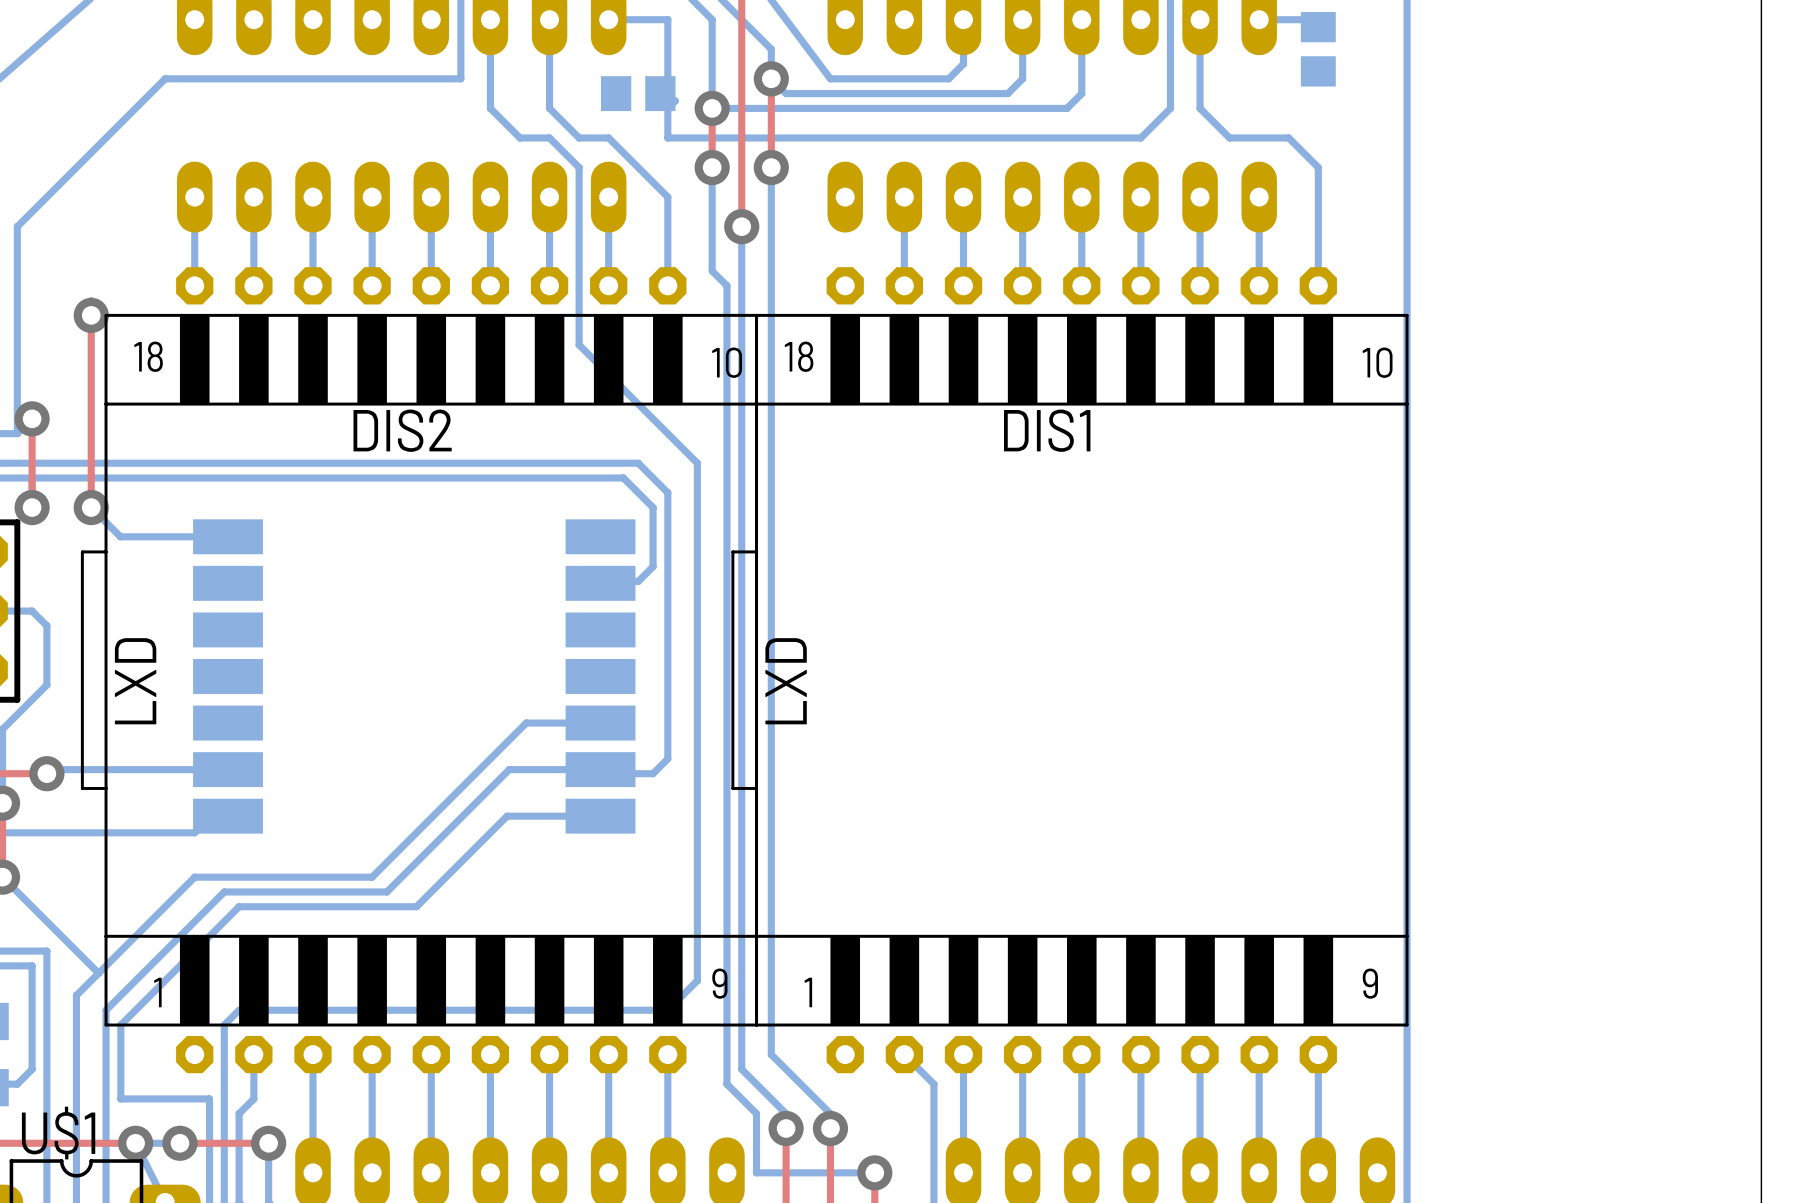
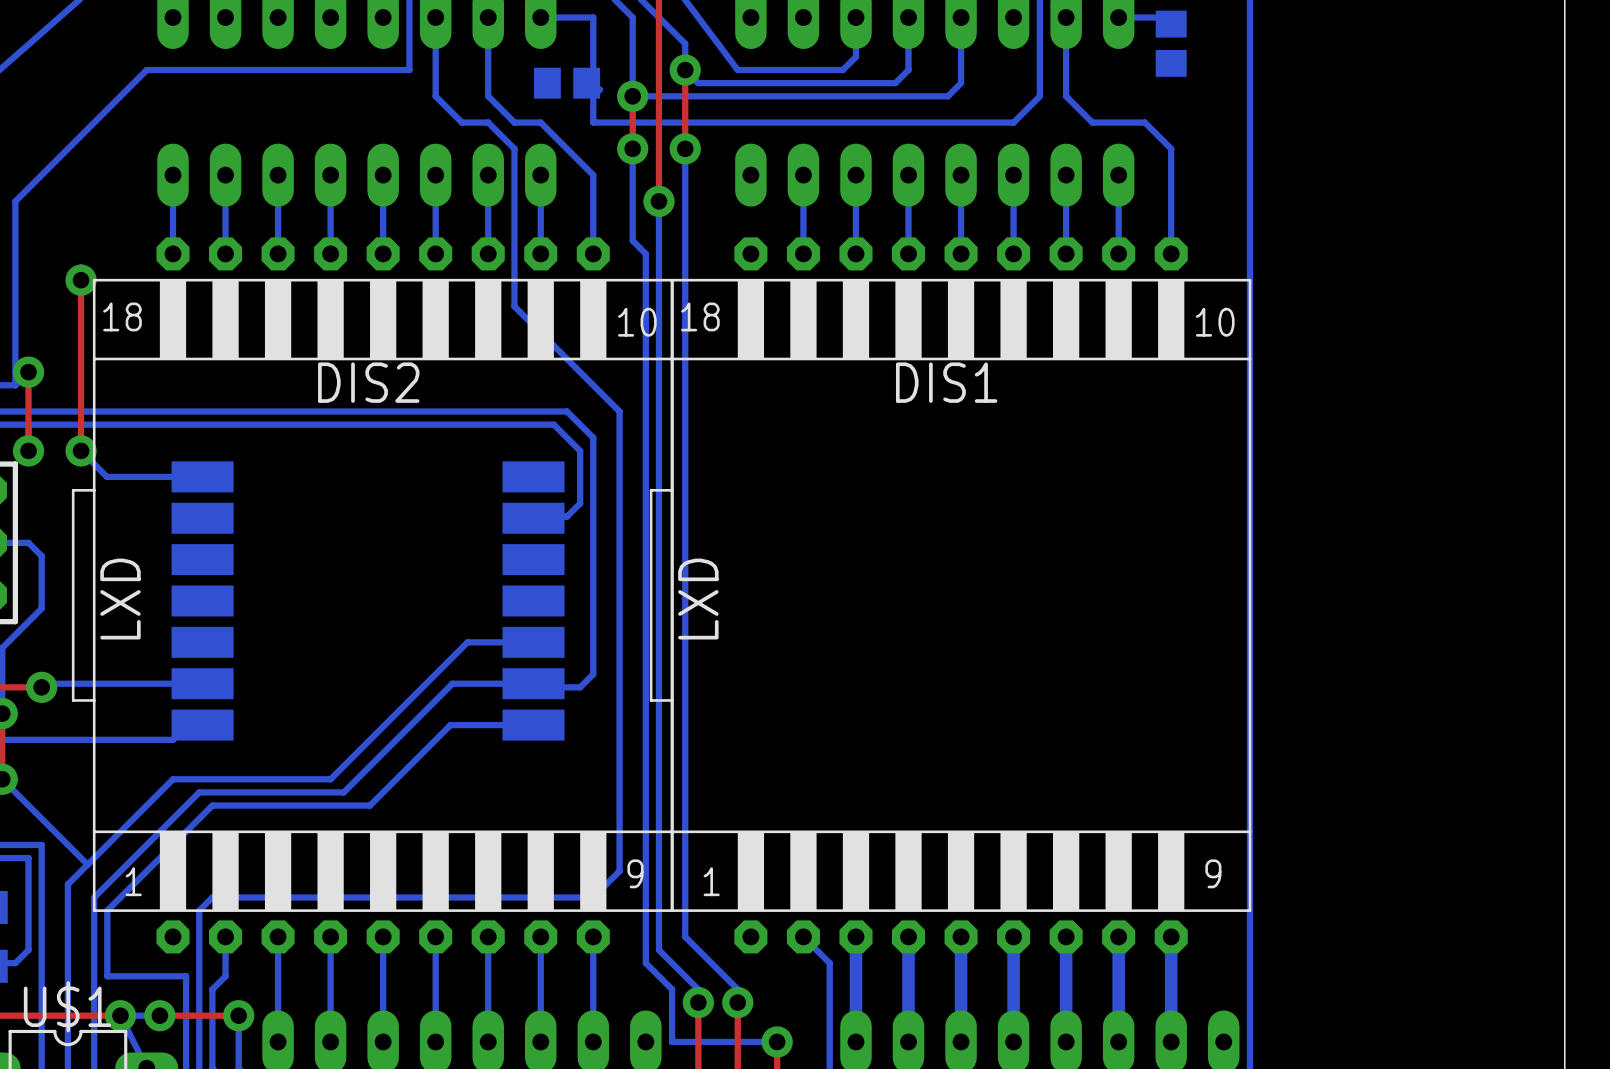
bottom track width: thin (963, 1054) (963, 1172) -> thick (855, 936) (855, 1041)
bottom track width: thin (1022, 1054) (1022, 1172) -> thick (908, 936) (908, 1041)
bottom track width: thin (1081, 1054) (1081, 1172) -> thick (961, 936) (961, 1041)
bottom track width: thin (1140, 1054) (1140, 1172) -> thick (1013, 936) (1013, 1041)
bottom track width: thin (1200, 1054) (1200, 1172) -> thick (1066, 936) (1066, 1041)
bottom track width: thin (1259, 1054) (1259, 1172) -> thick (1118, 936) (1118, 1041)
bottom track width: thin (1318, 1054) (1318, 1172) -> thick (1171, 936) (1171, 1041)

